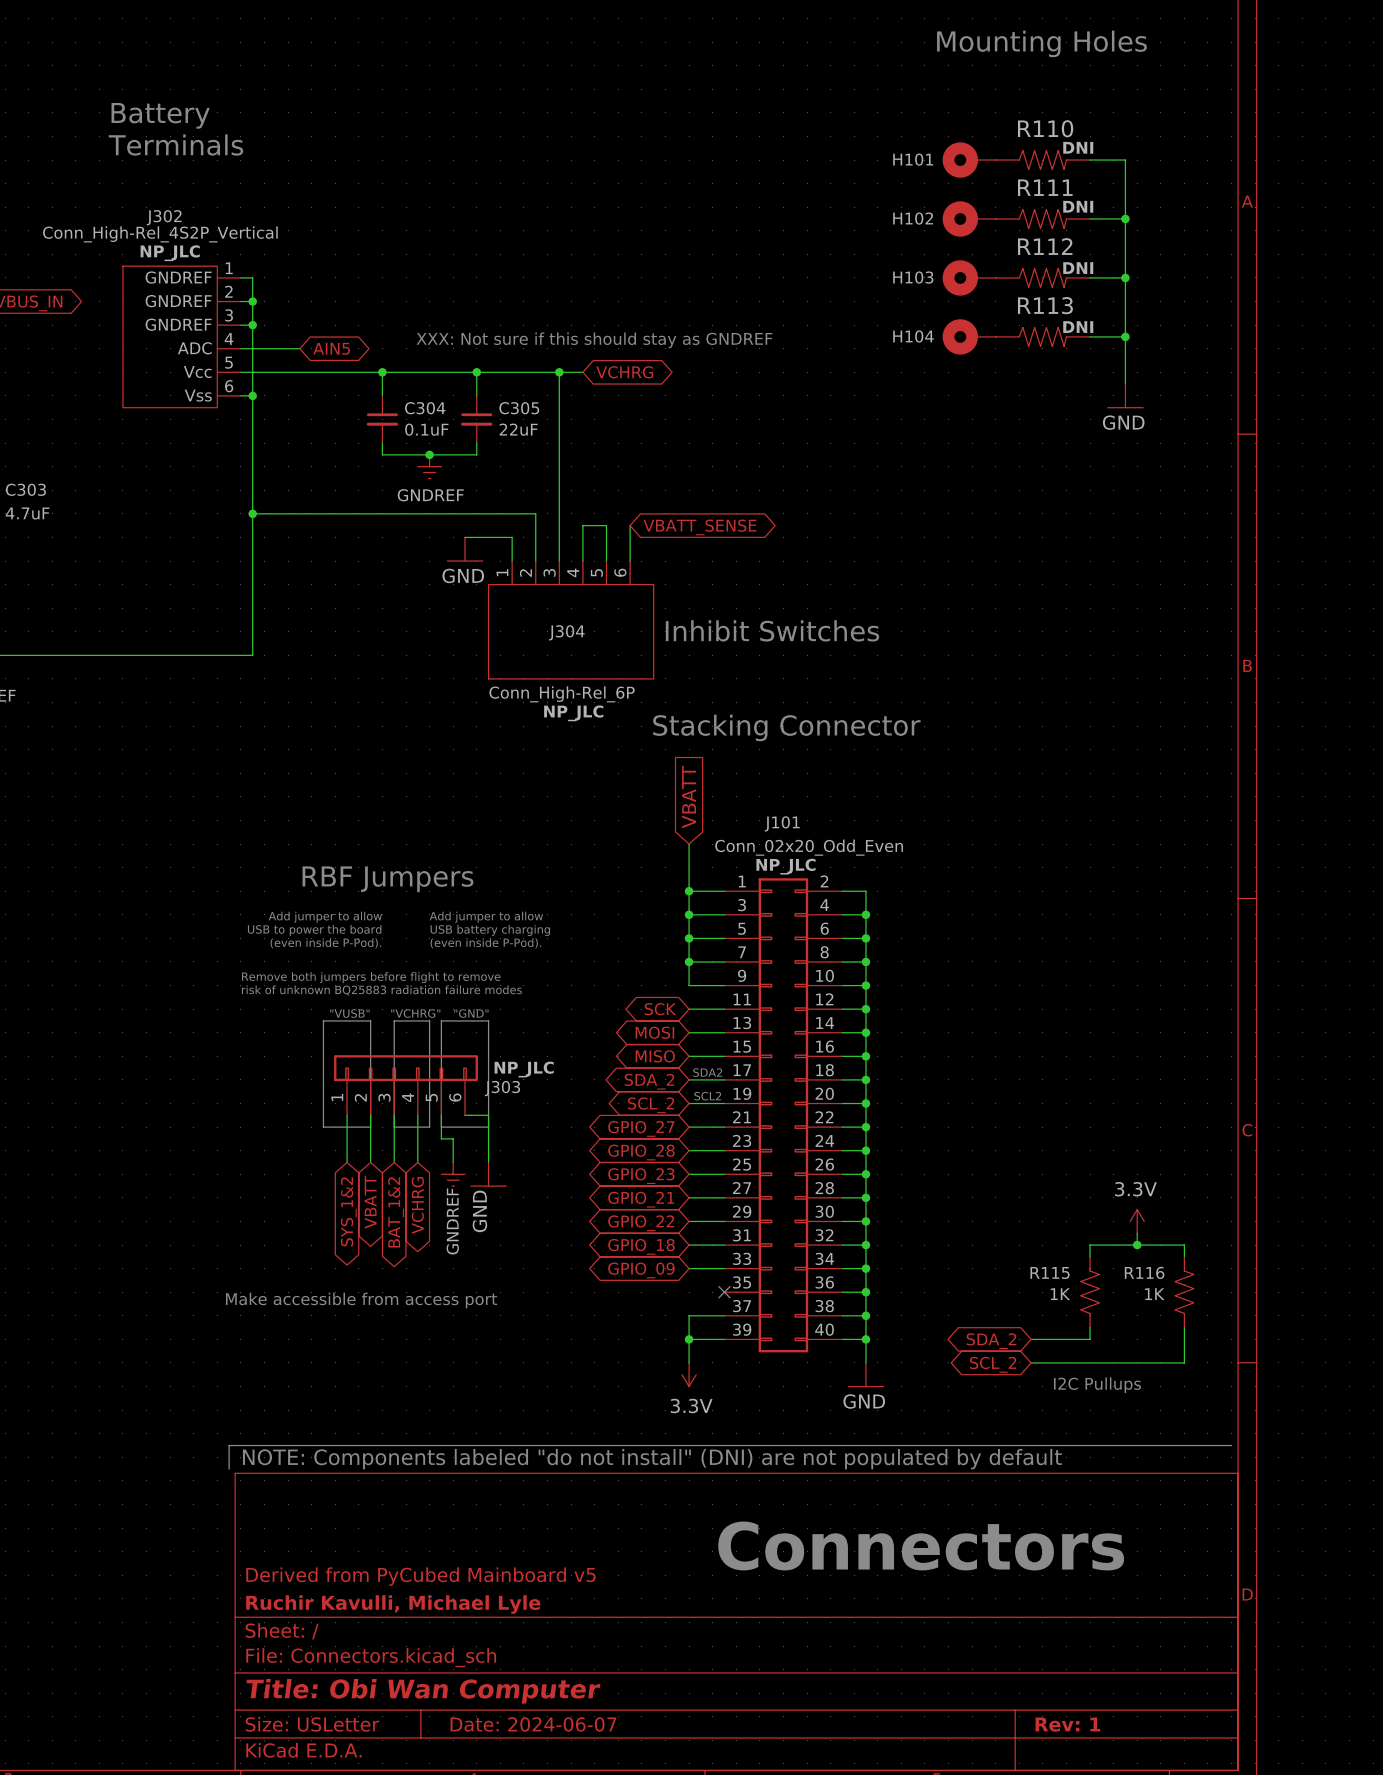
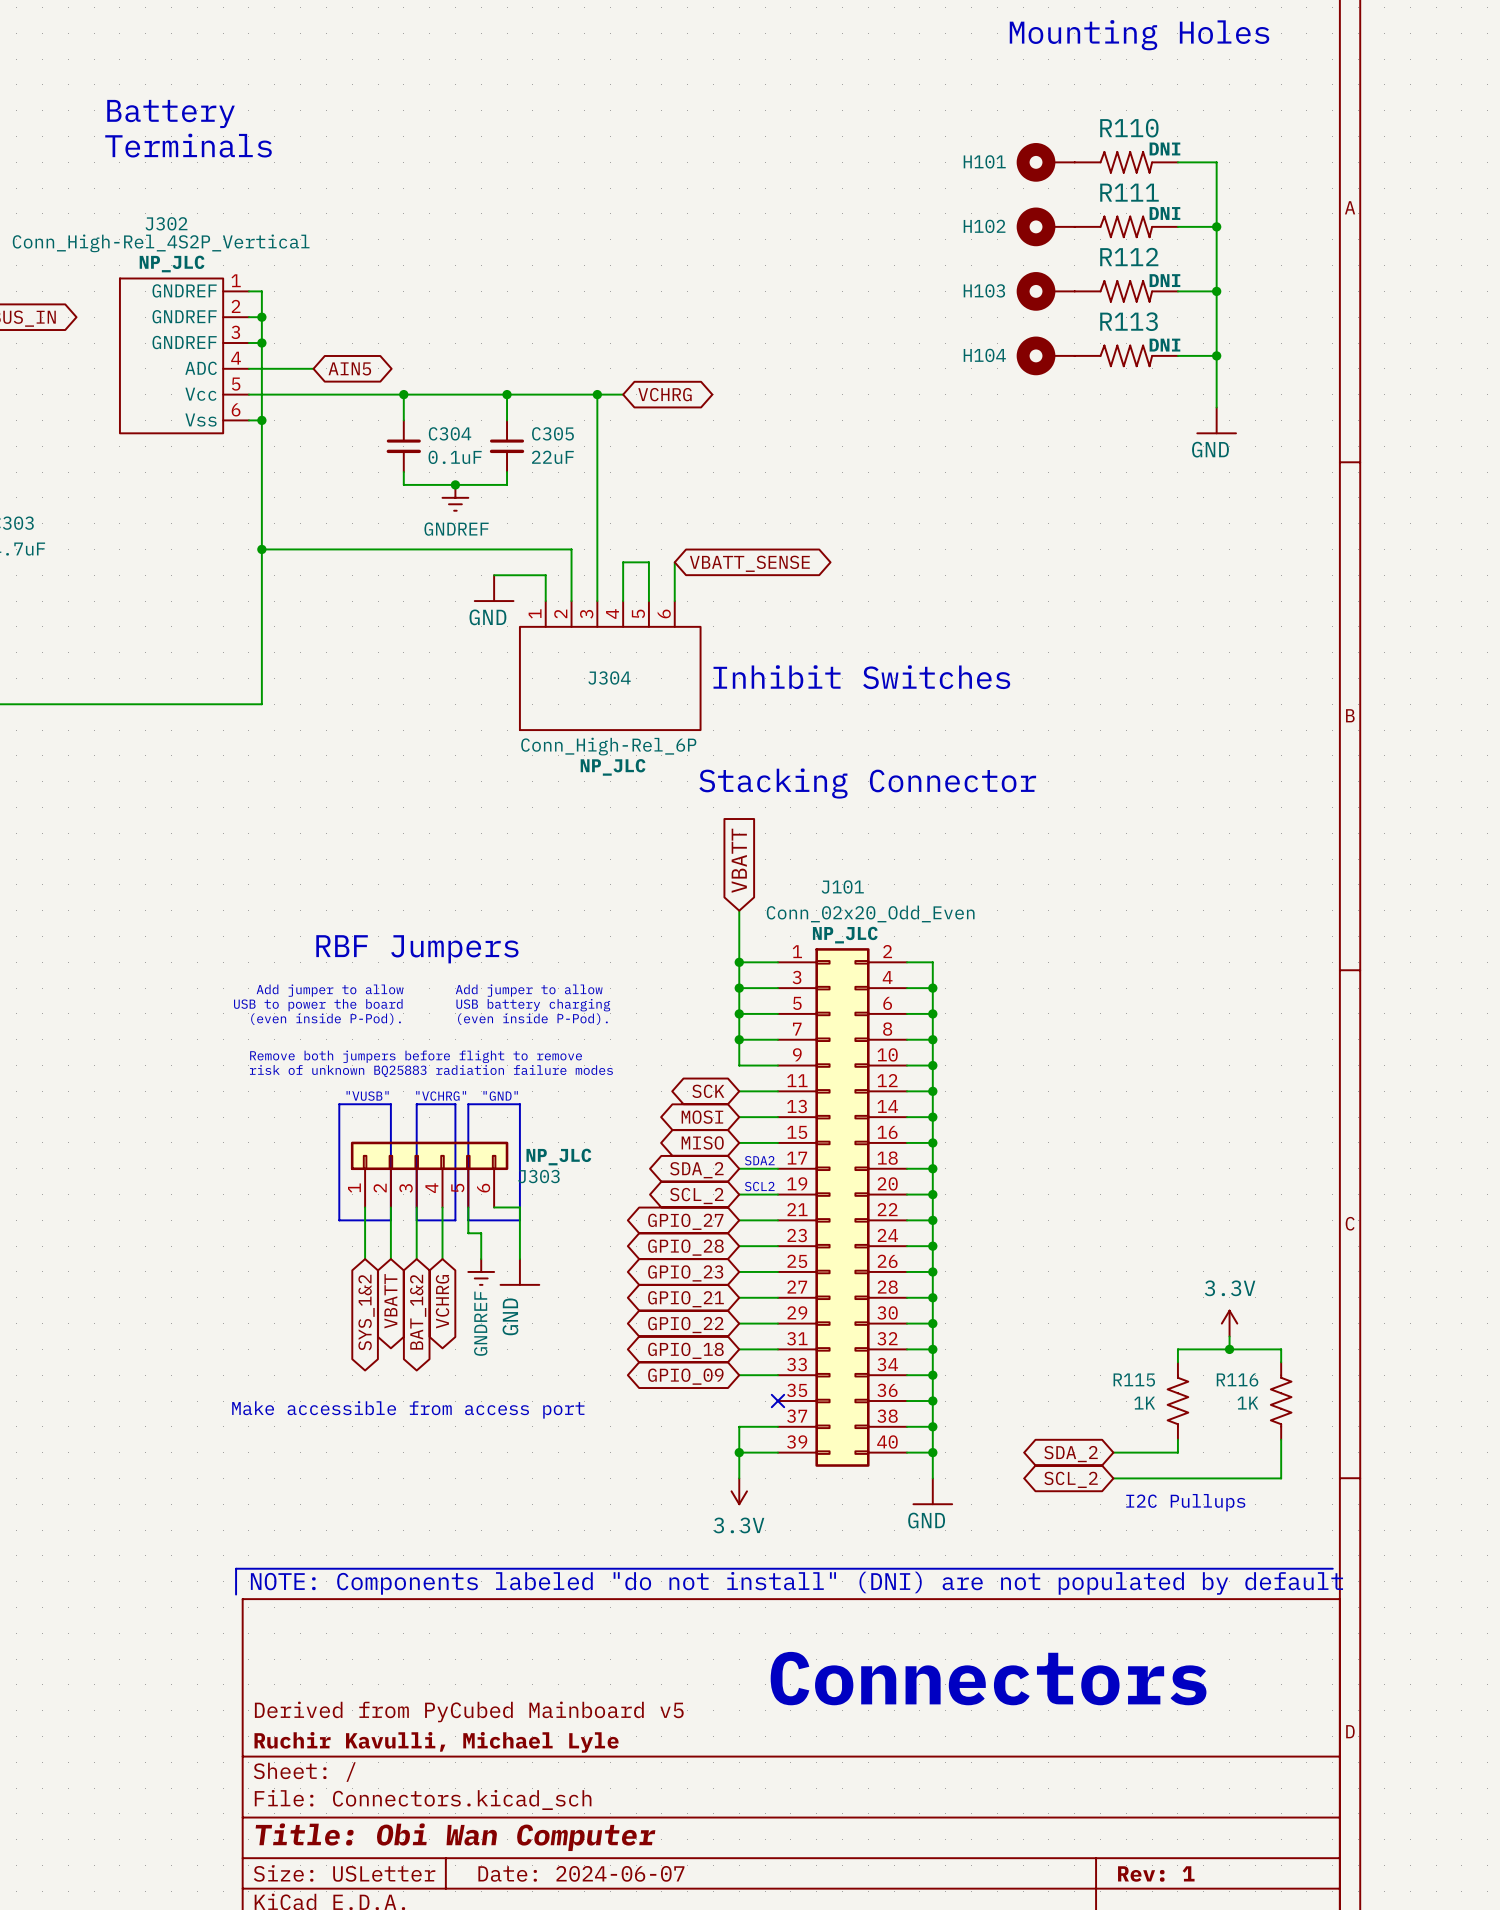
text: XXX: Not sure if this should stay as GNDREF (594, 340) -> none

